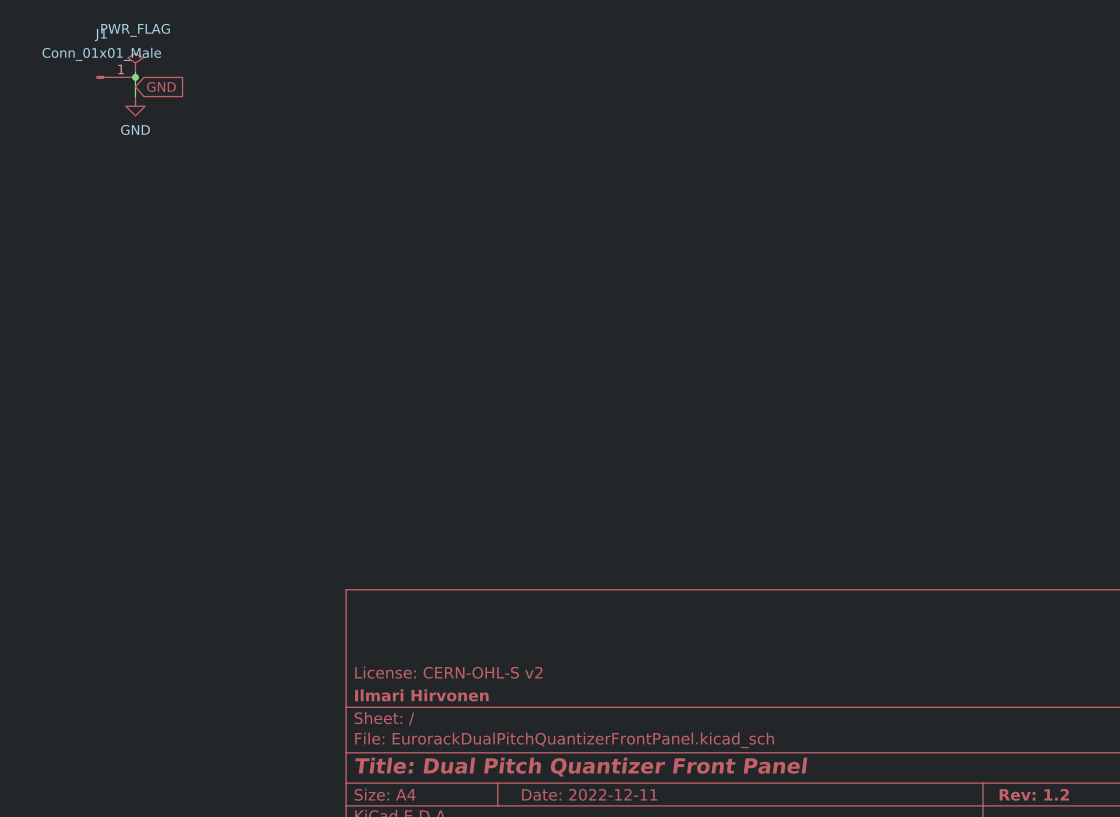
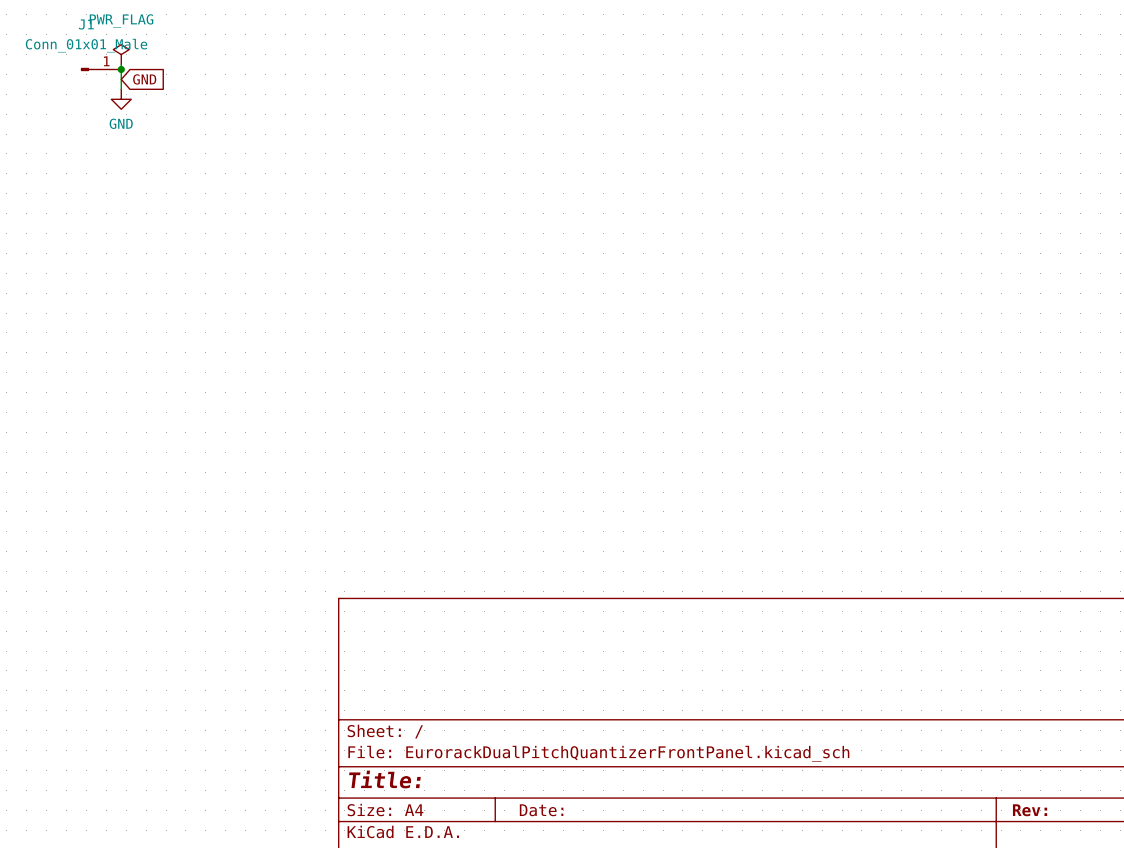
title block: License: CERN-OHL-S v2 (448, 672) -> none
title block: Ilmari Hirvonen (421, 695) -> none
title block: Title: Dual Pitch Quantizer Front Panel (581, 767) -> Title: (384, 779)
title block: Date: 2022-12-11 (589, 794) -> Date: (541, 810)
title block: Rev: 1.2 (1034, 794) -> Rev: (1030, 810)

